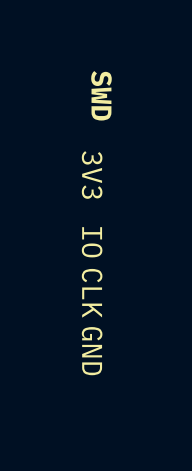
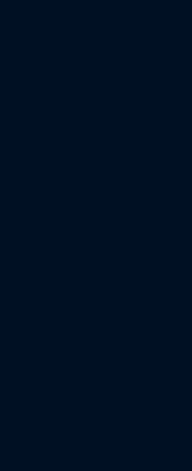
text: SWD (101, 95) -> none
text: 3V3 (92, 174) -> none
text: IO (92, 242) -> none
text: CLK (92, 293) -> none
text: GND (92, 351) -> none

